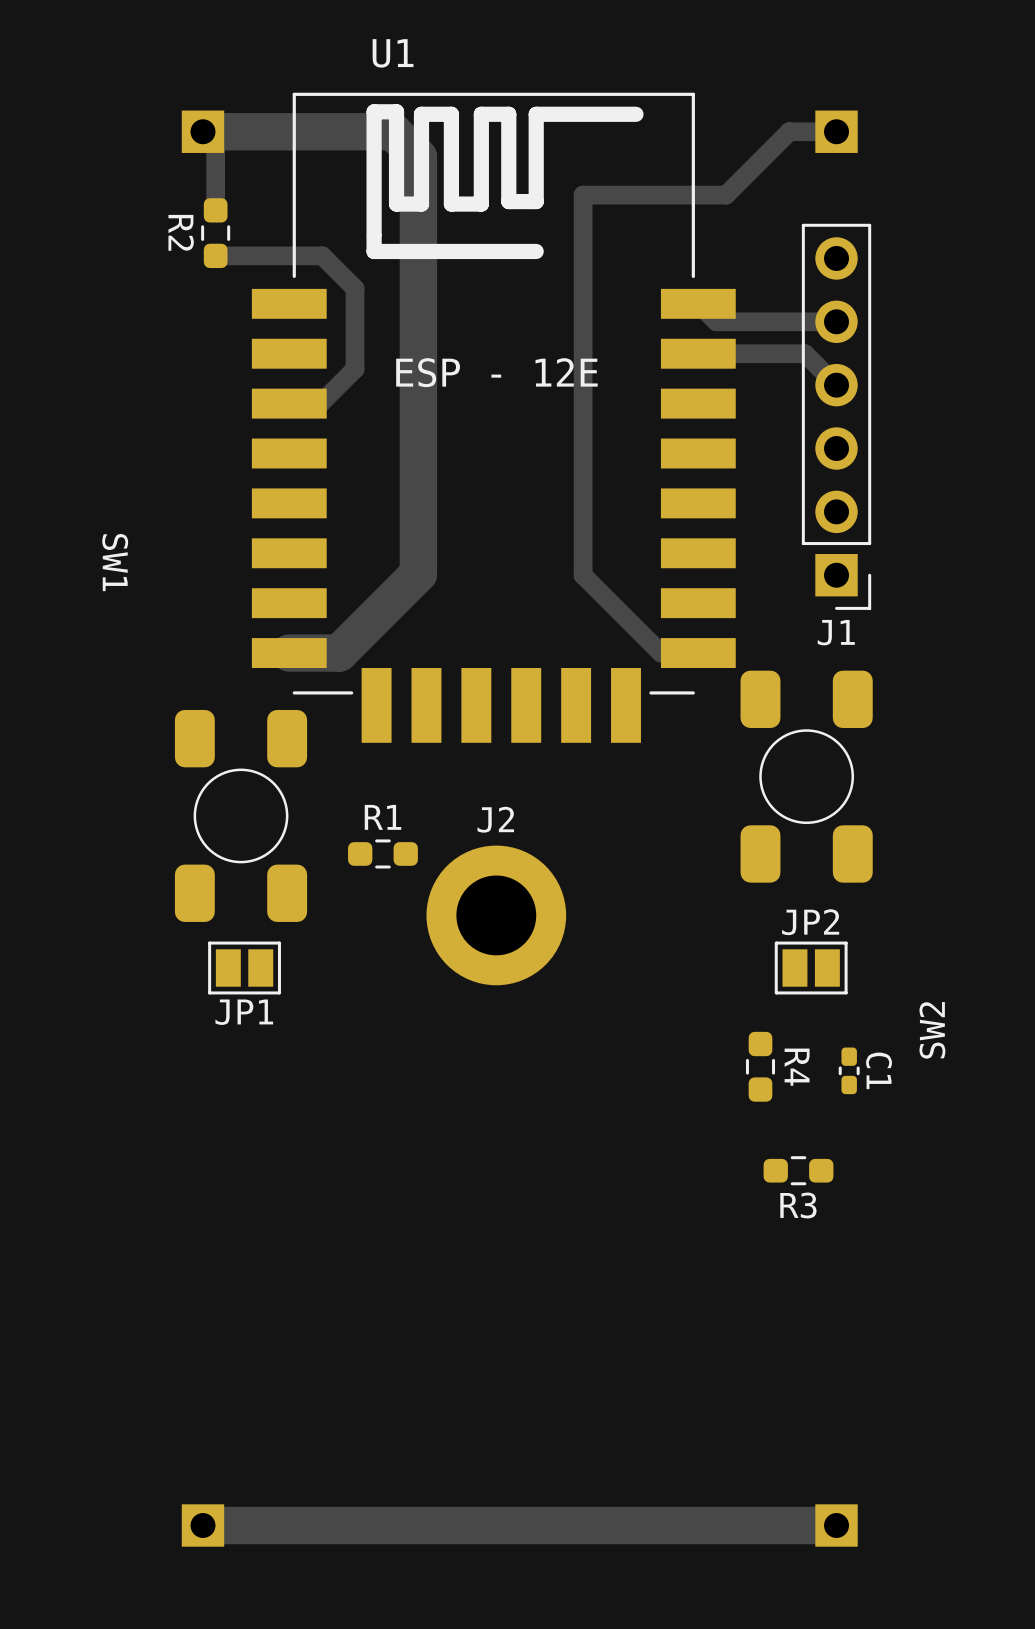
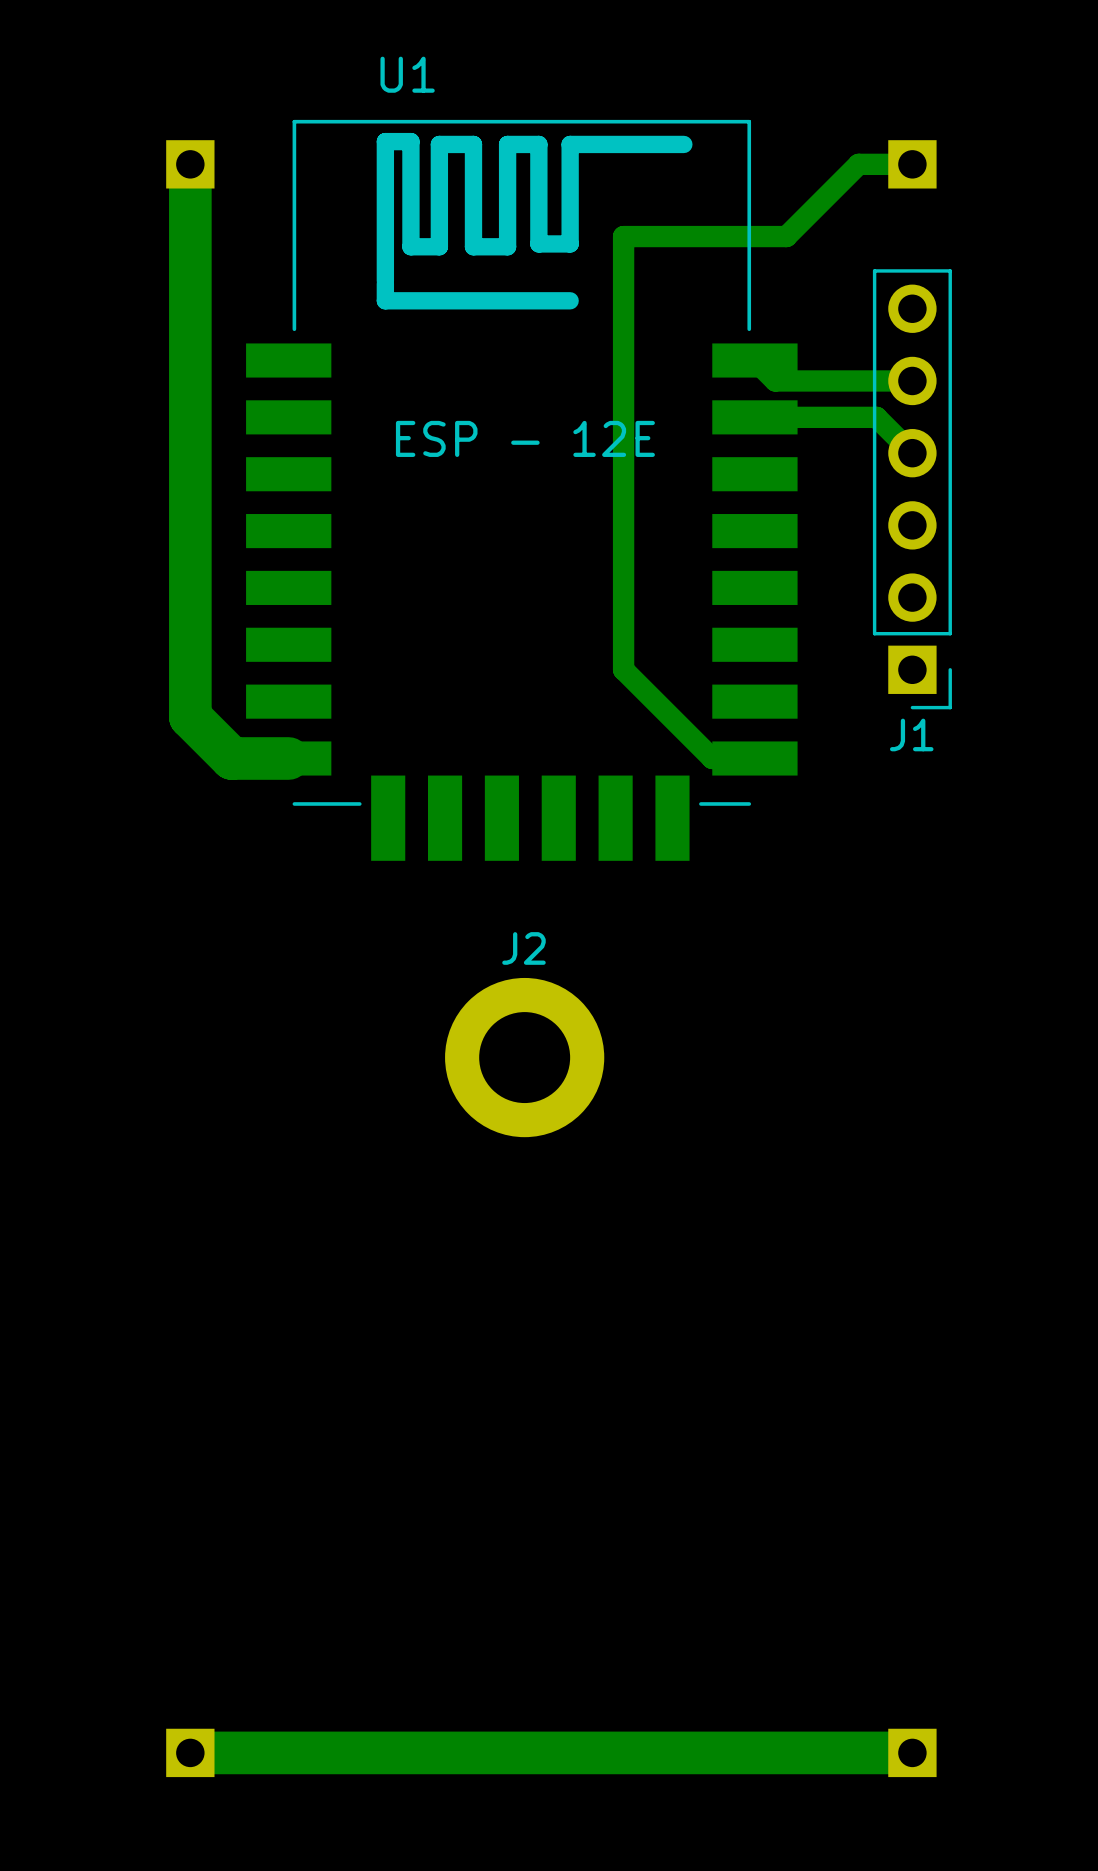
track: (215, 210) (215, 144) (202, 131) (393, 131) (418, 157) (418, 573) (339, 653) (289, 653) -> (190, 164) (190, 716) (231, 758) (288, 758)
R2: (215, 233) -> none
track: (215, 255) (322, 255) (355, 288) (355, 369) (320, 403) (289, 403) -> none
SW2: (806, 776) -> none
SW1: (241, 815) -> none
R1: (382, 853) -> none
JP1: (244, 968) -> none
JP2: (811, 968) -> none
R4: (760, 1066) -> none
C1: (849, 1070) -> none
R3: (798, 1170) -> none

